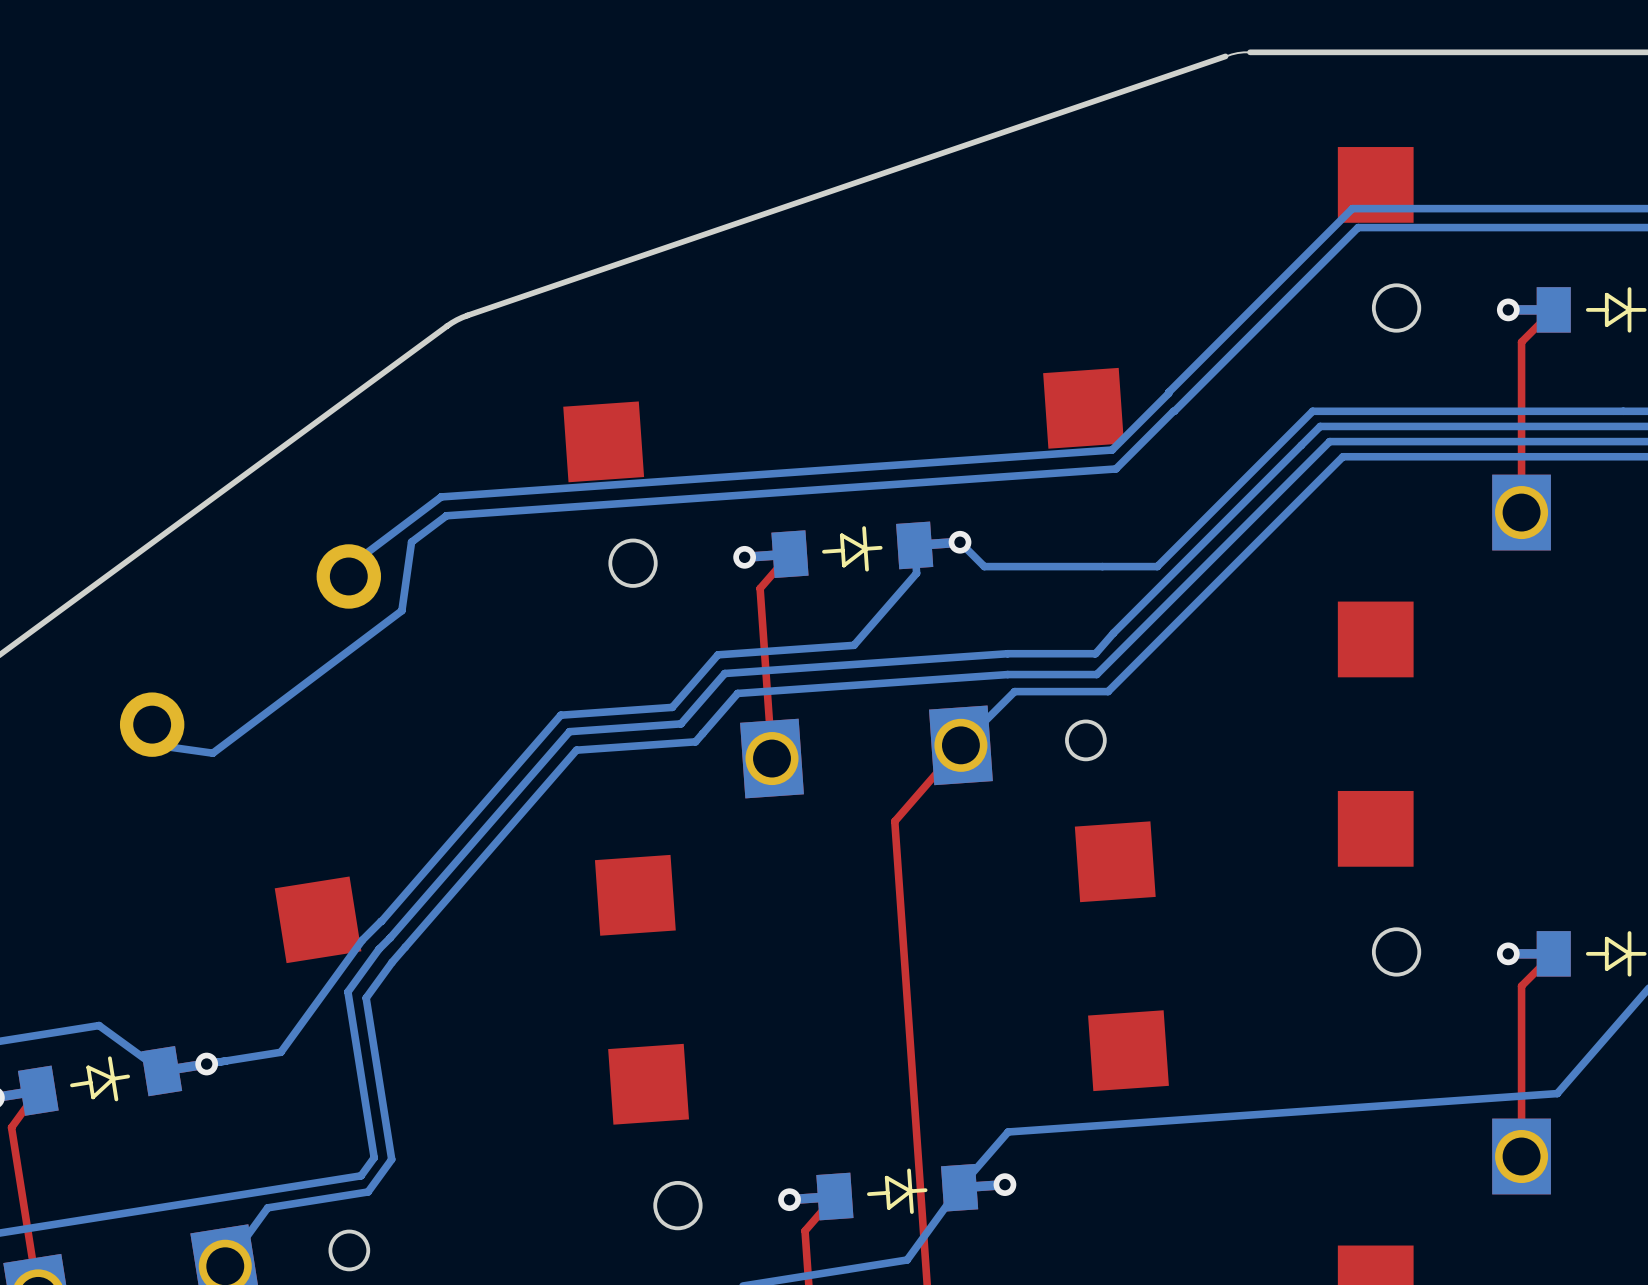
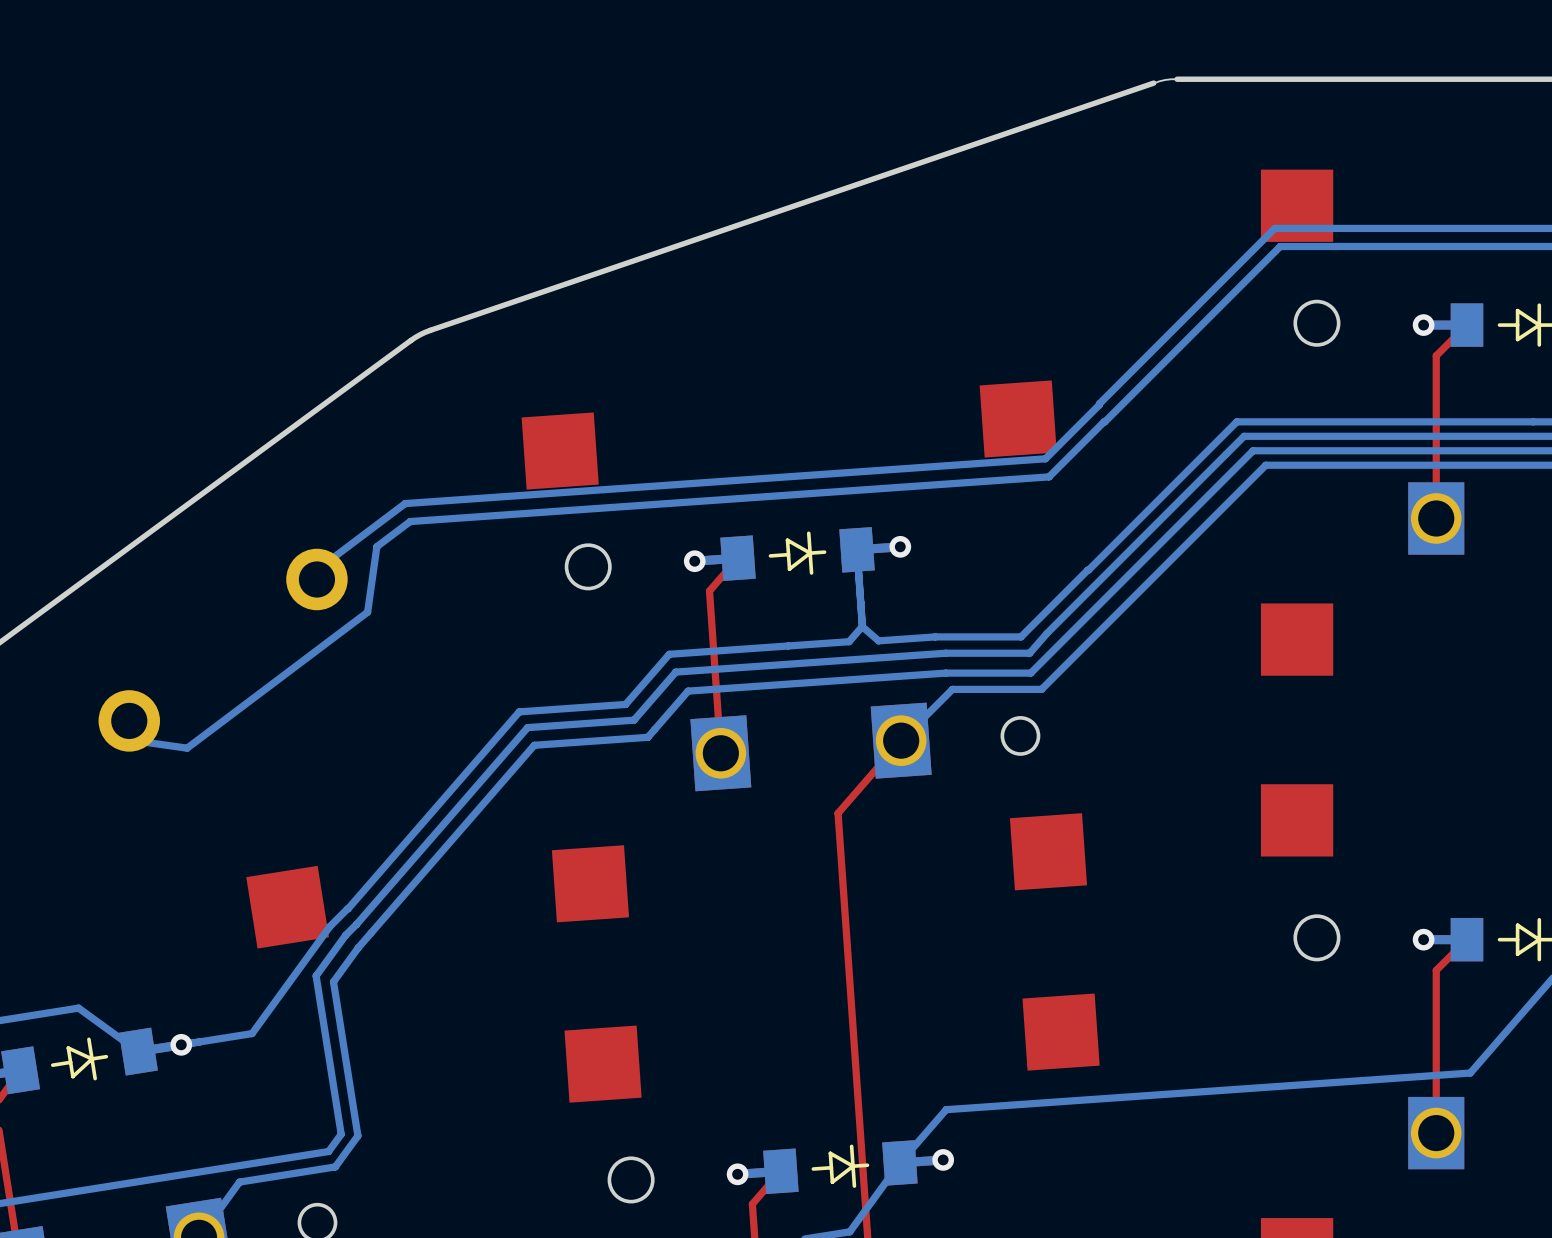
bottom track: (960, 542) (984, 566) (1156, 566) -> (862, 626) (878, 640) (935, 636) (1021, 636) (1087, 570)
bottom track: (916, 573) (853, 645) -> (858, 576) (862, 626) (849, 641) (799, 645)

